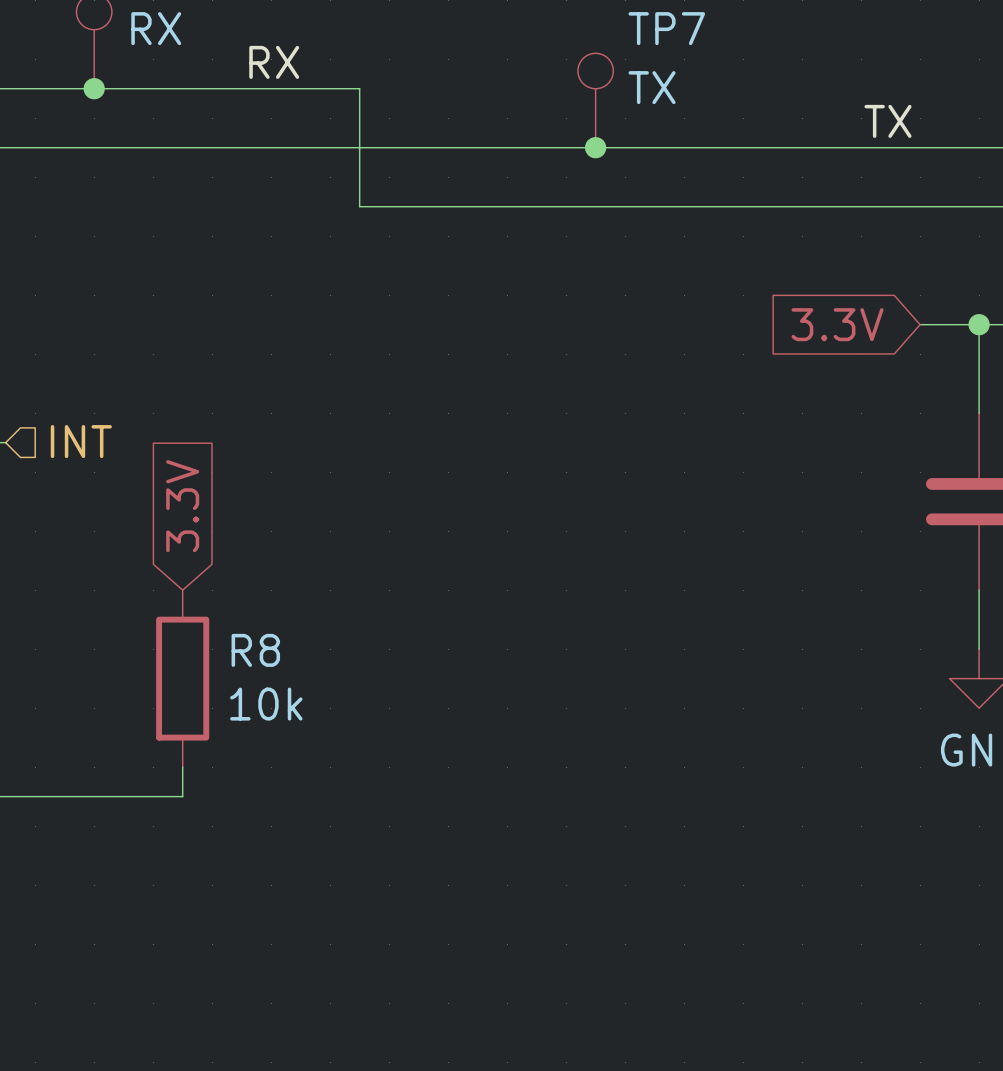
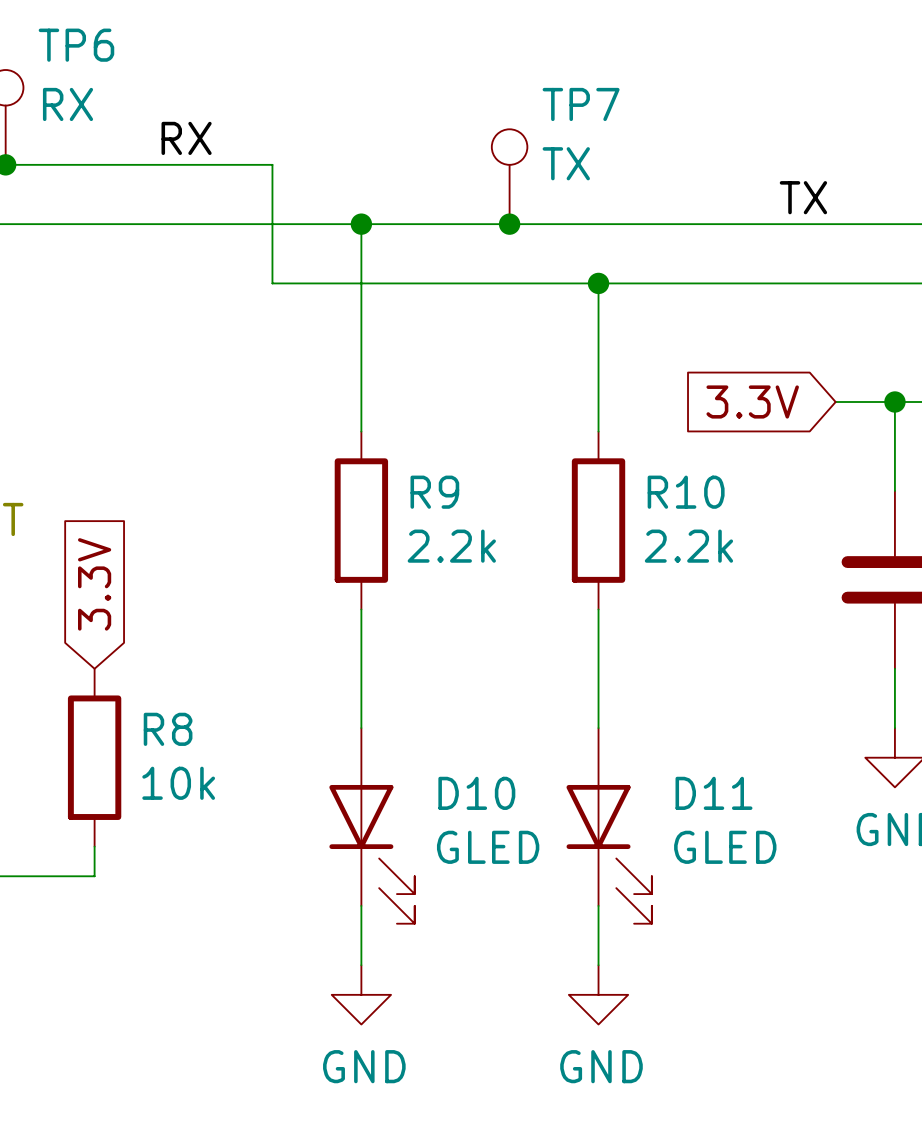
wire: none -> (361, 224) (361, 431)
junction: none -> (361, 224)
wire: none -> (598, 283) (598, 431)
junction: none -> (598, 283)
R9: none -> 2.2k (361, 520)
R10: none -> 2.2k (598, 520)
wire: none -> (361, 609) (361, 728)
wire: none -> (598, 609) (598, 728)
D10: none -> GLED (372, 825)
D11: none -> GLED (609, 825)
wire: none -> (361, 905) (361, 965)
wire: none -> (598, 905) (598, 965)
power symbol: none -> GND (361, 994)
power symbol: none -> GND (598, 994)

